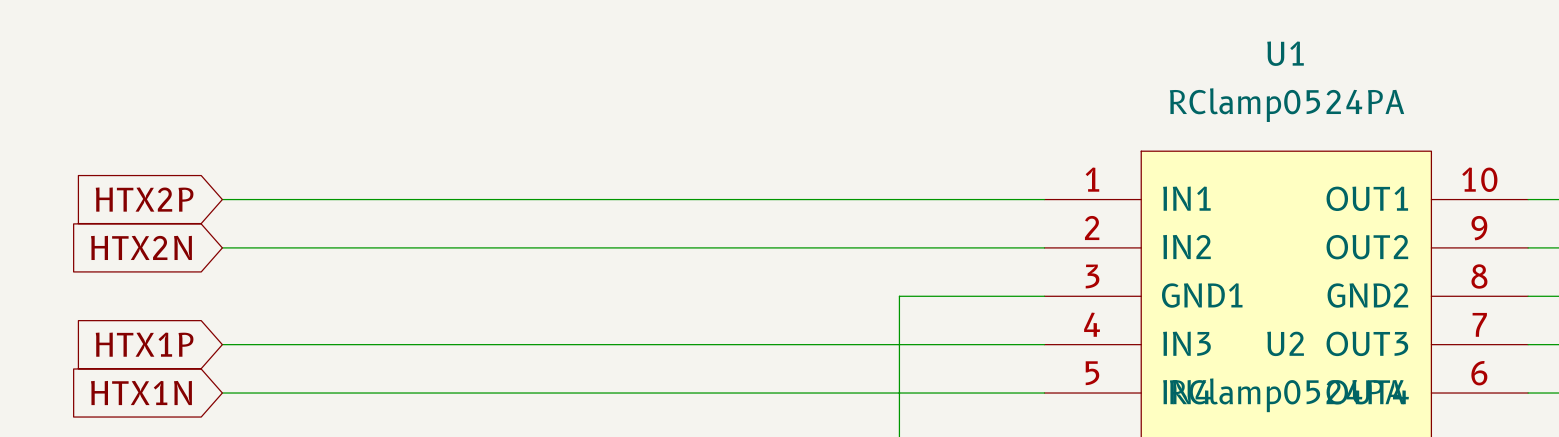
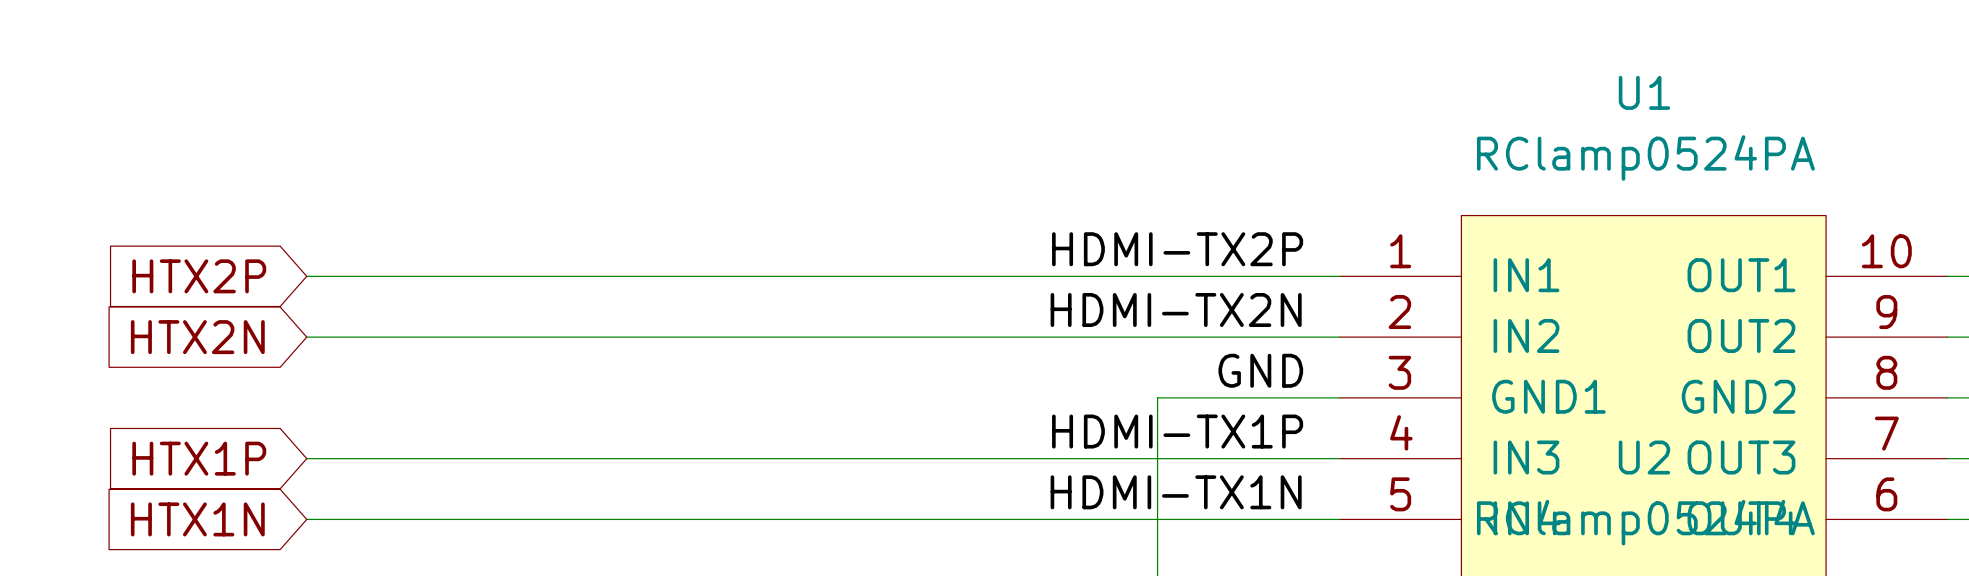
label: none -> HDMI-TX2P (1177, 249)
label: none -> HDMI-TX2N (1176, 309)
label: none -> GND (1260, 370)
label: none -> HDMI-TX1P (1177, 431)
label: none -> HDMI-TX1N (1176, 492)

